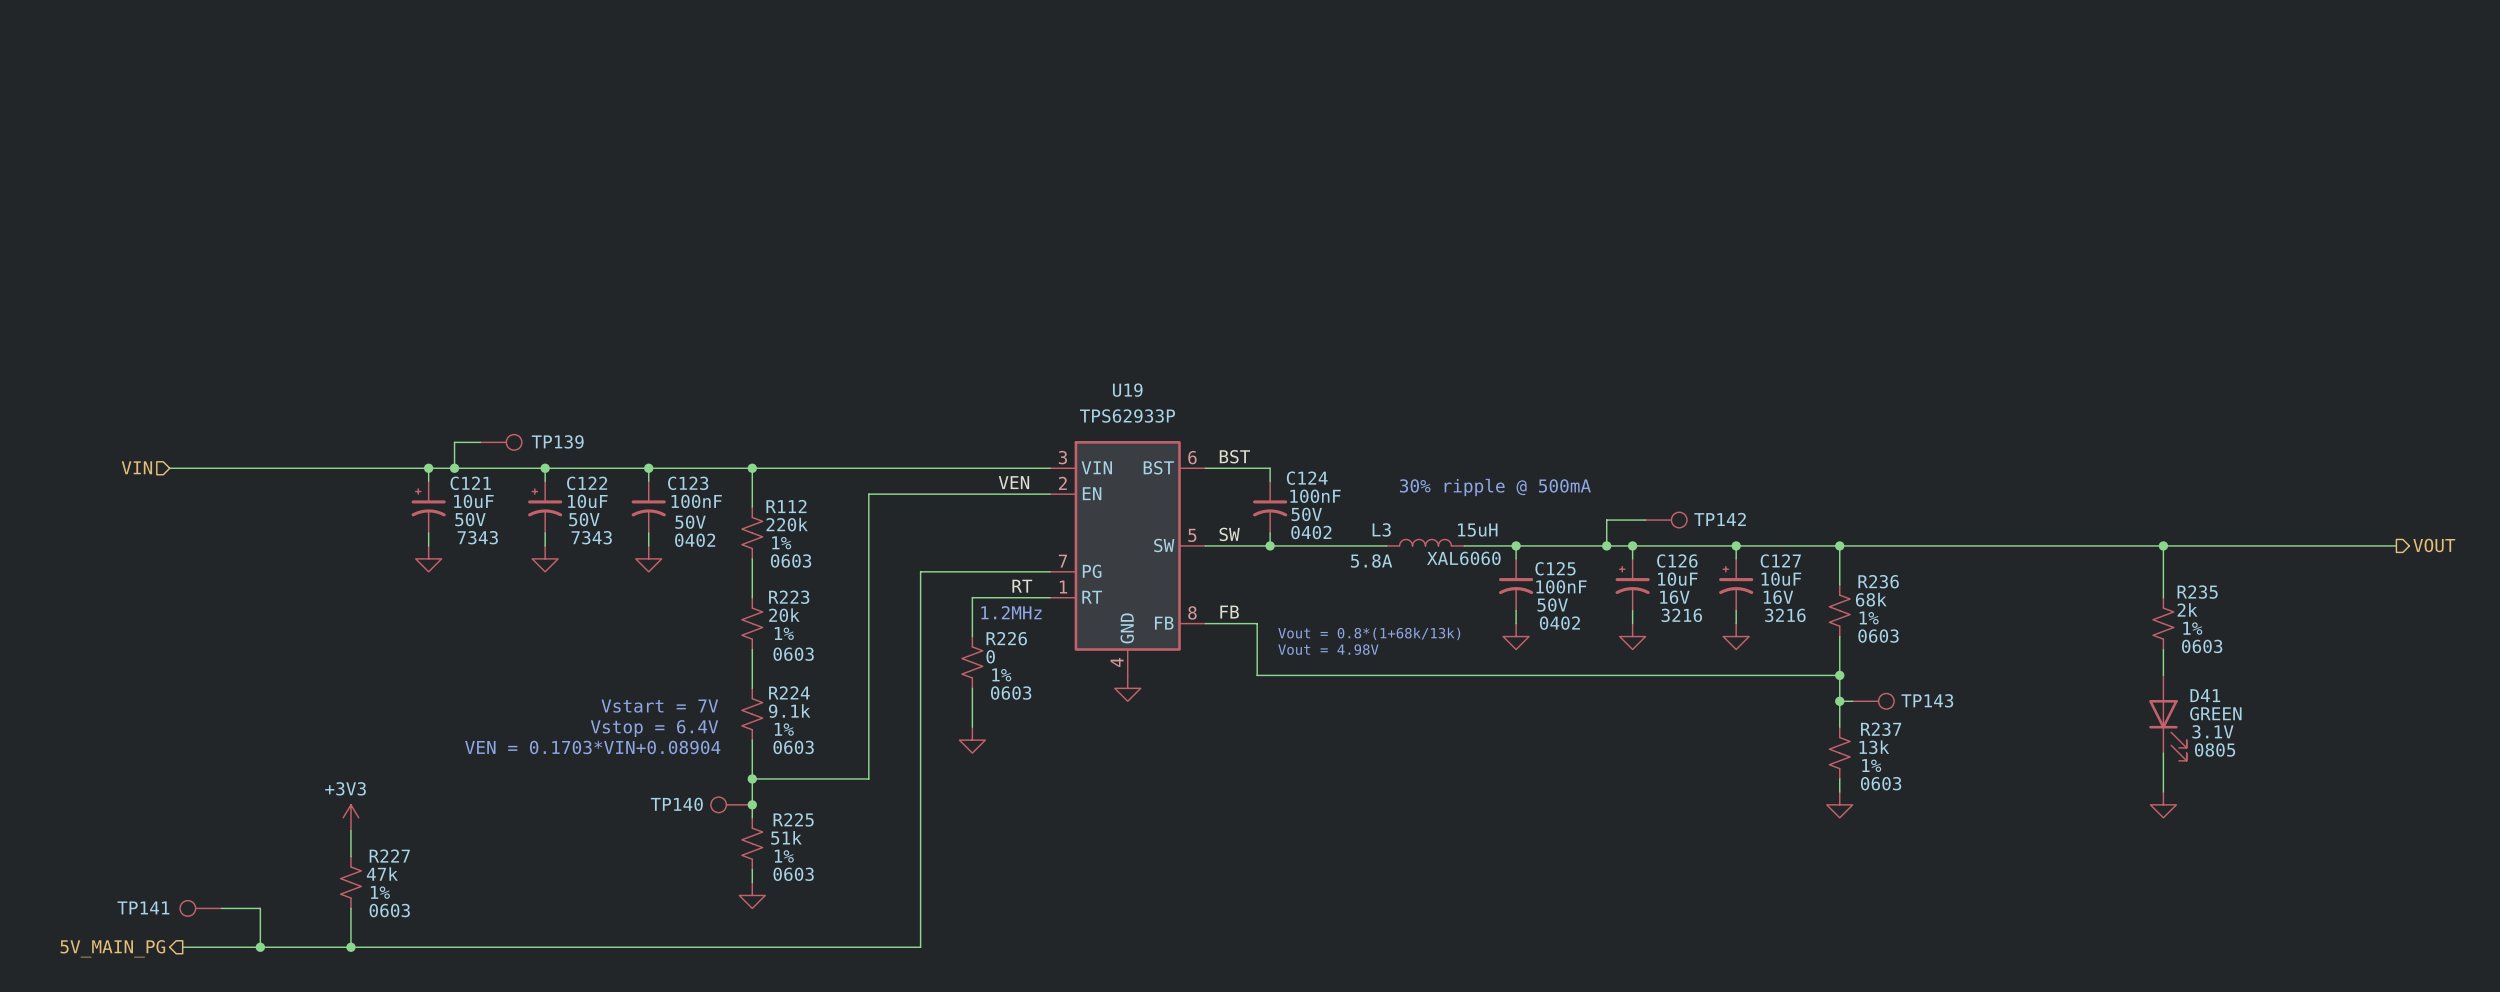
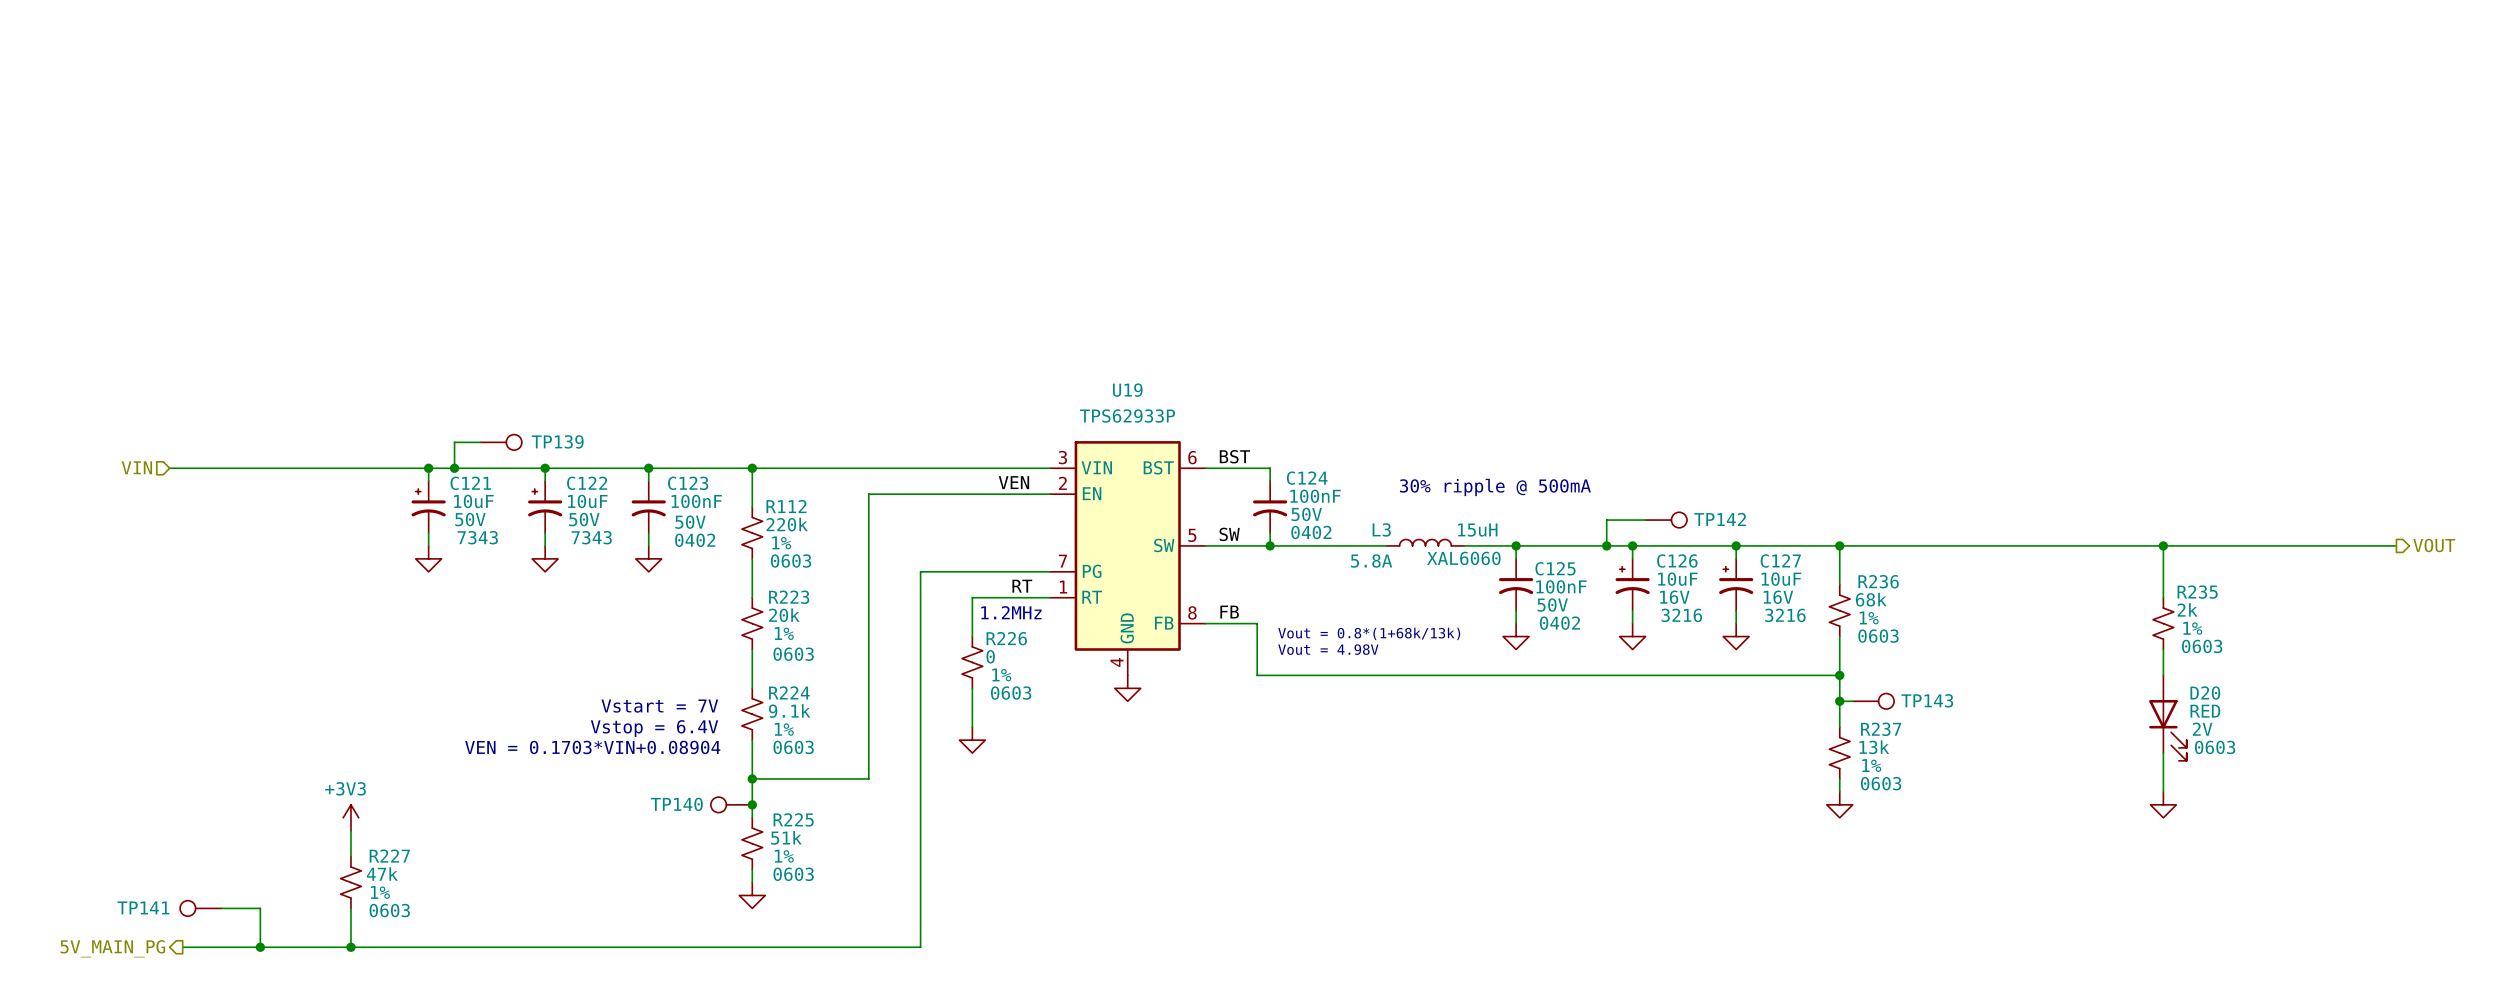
D41 name: D41 (2205, 695) -> D20 (2205, 693)
D41 value: GREEN (2215, 713) -> RED (2205, 711)
D41 text: 3.1V (2212, 731) -> 2V (2202, 729)
D41 text: 0805 (2215, 750) -> 0603 (2215, 747)

